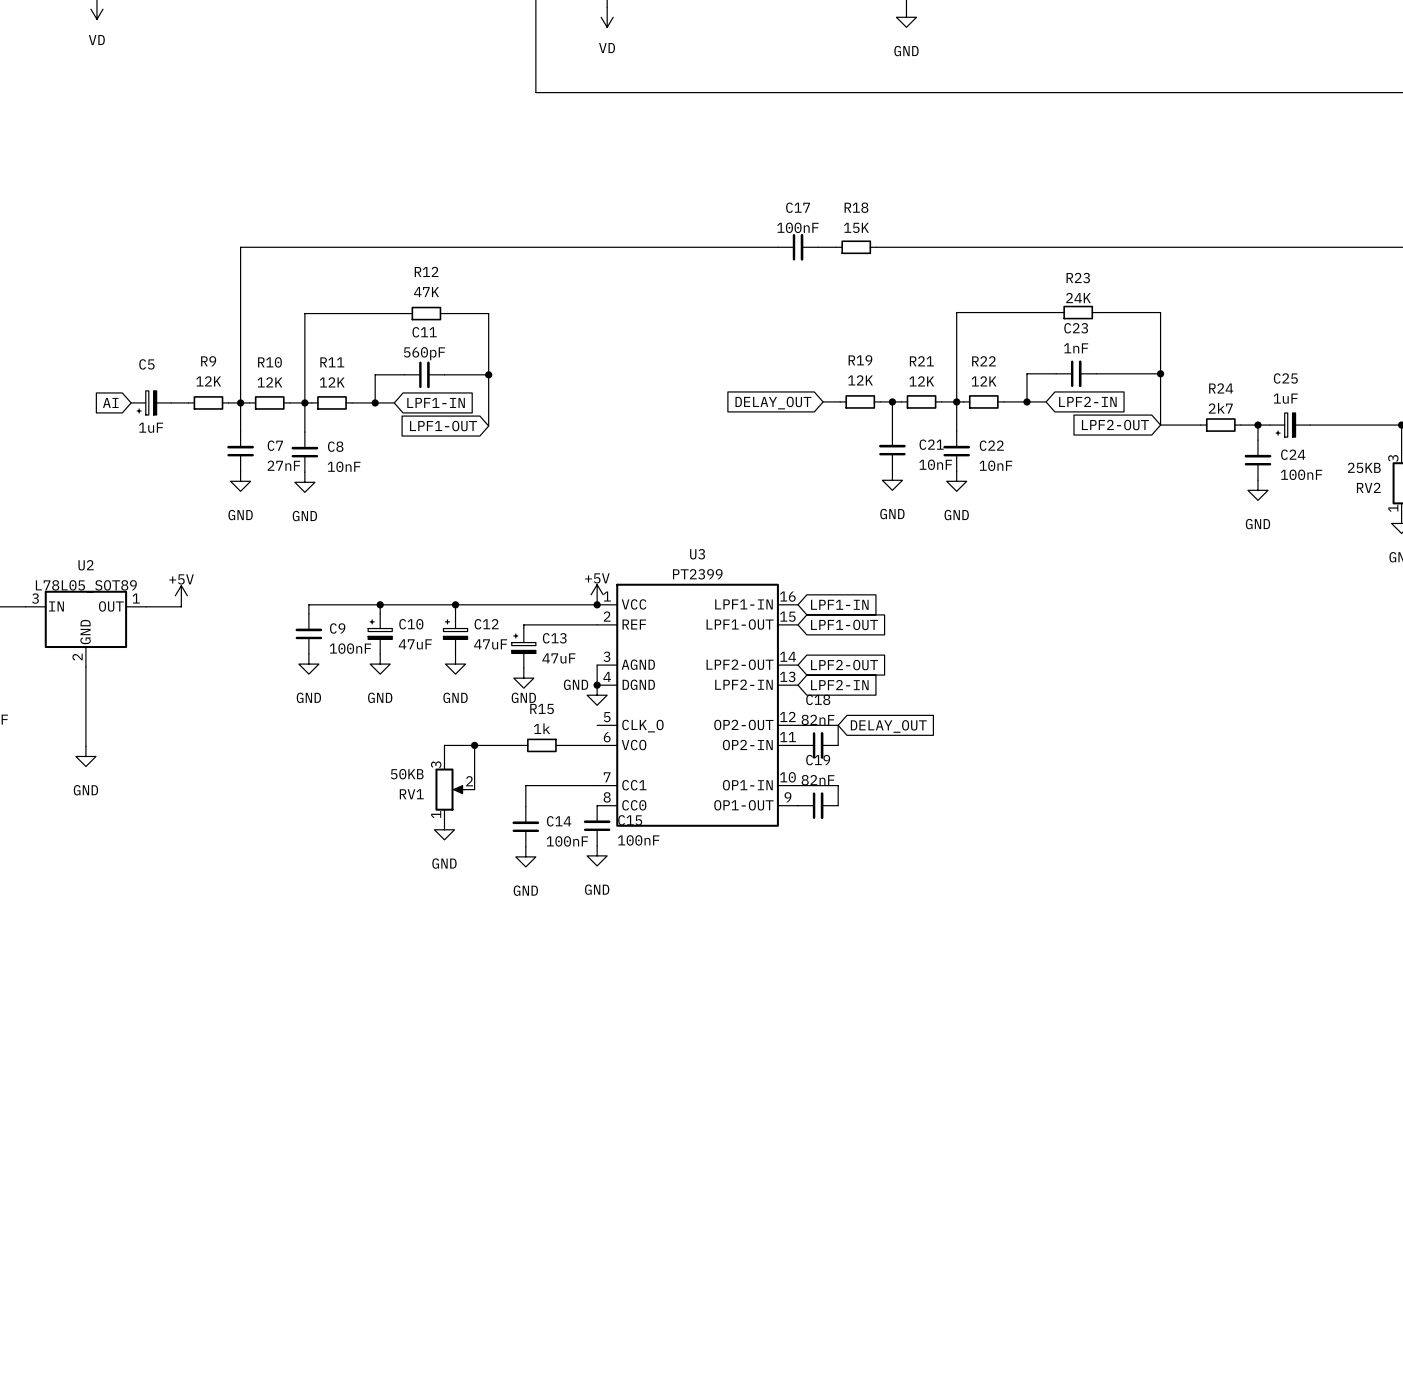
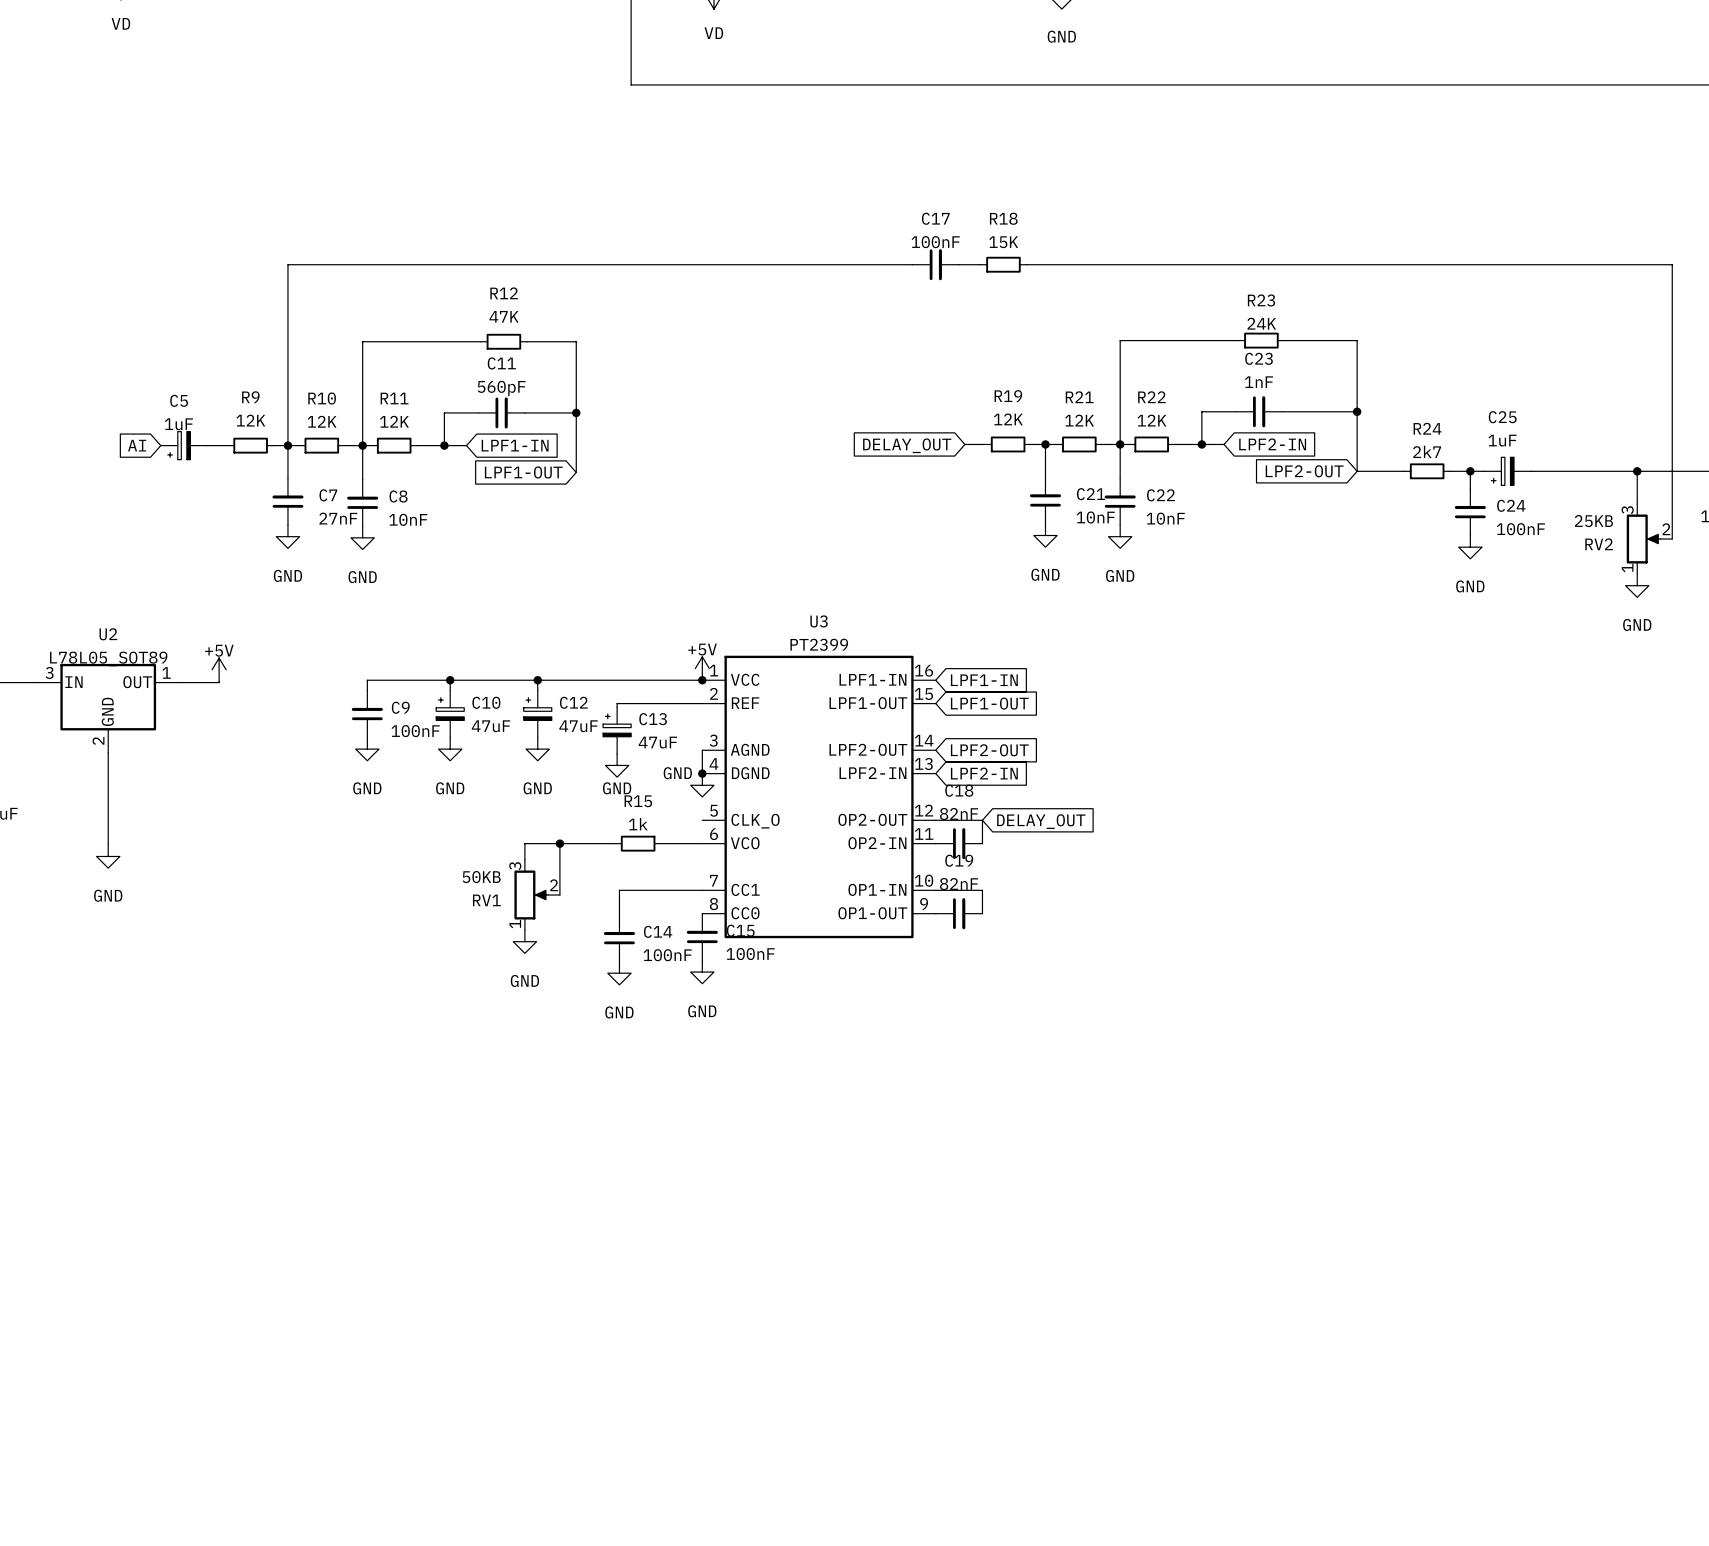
C5 value position: 1uF (151, 427) -> 1uF (178, 424)

